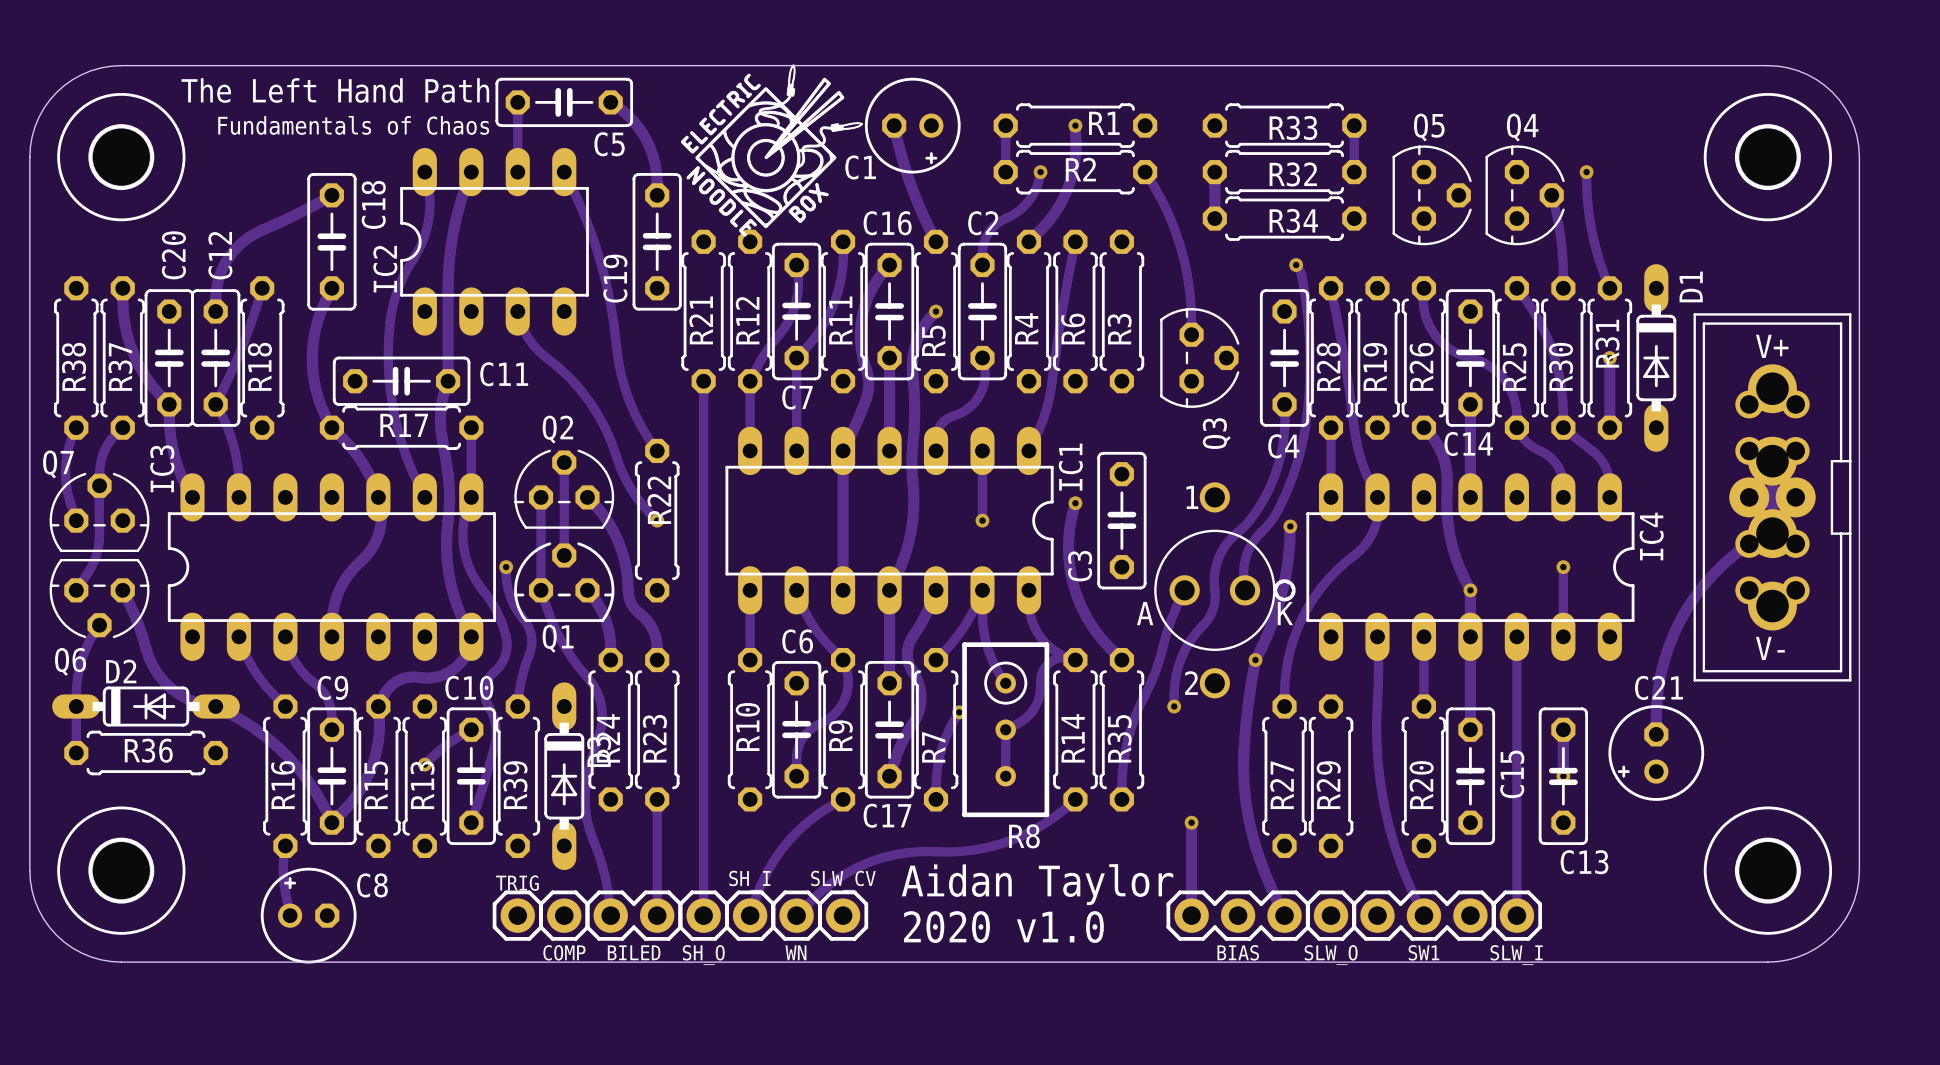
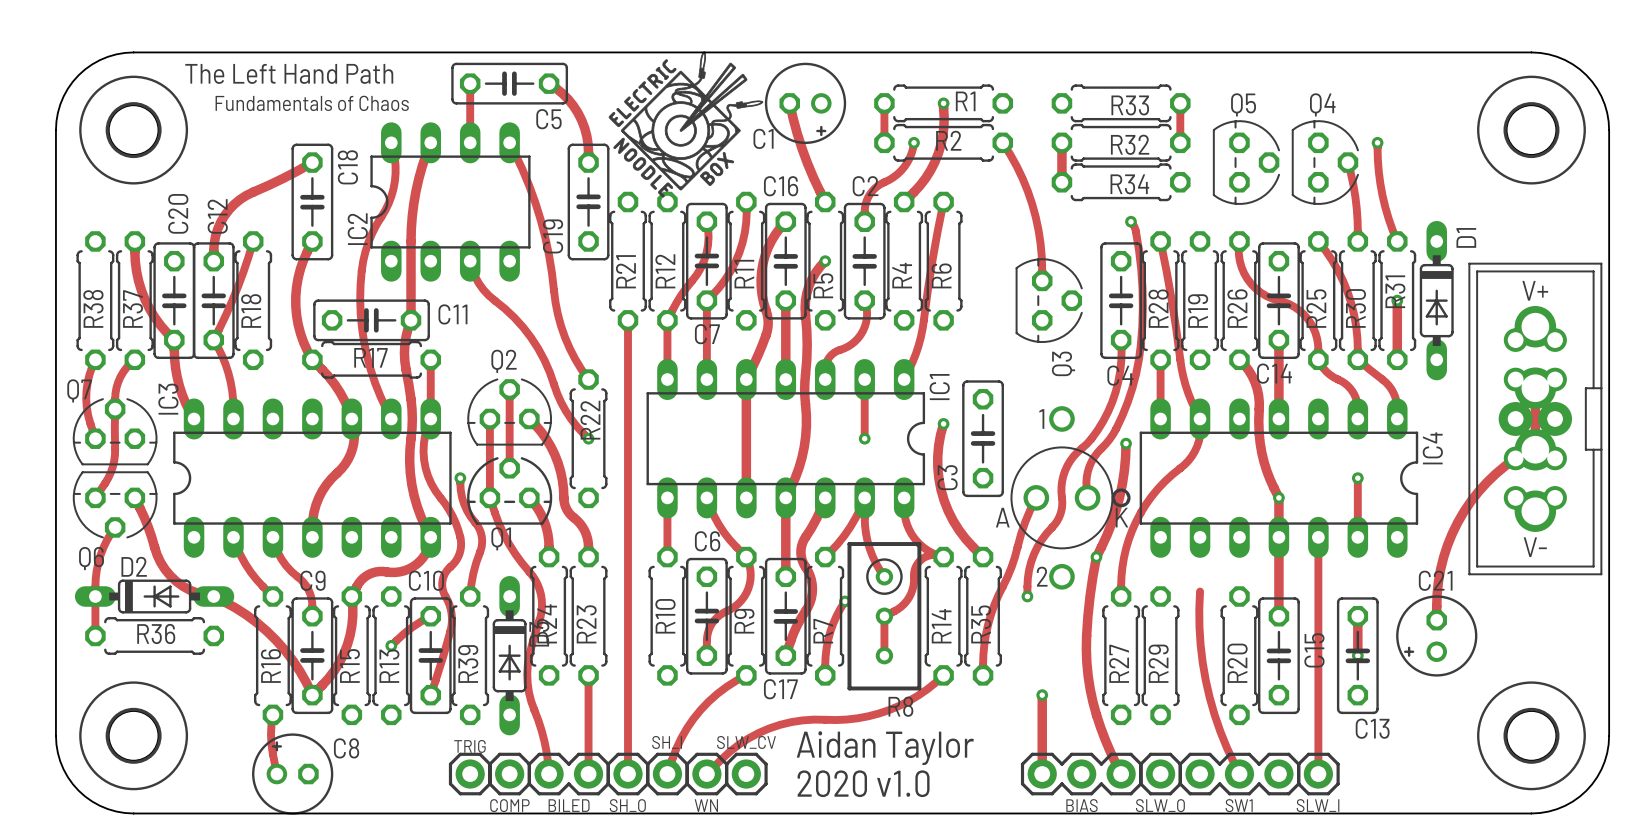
R3: (1121, 311) -> none
track: (1377, 636) (1377, 700) -> none
track: (1423, 636) (1423, 706) -> none

